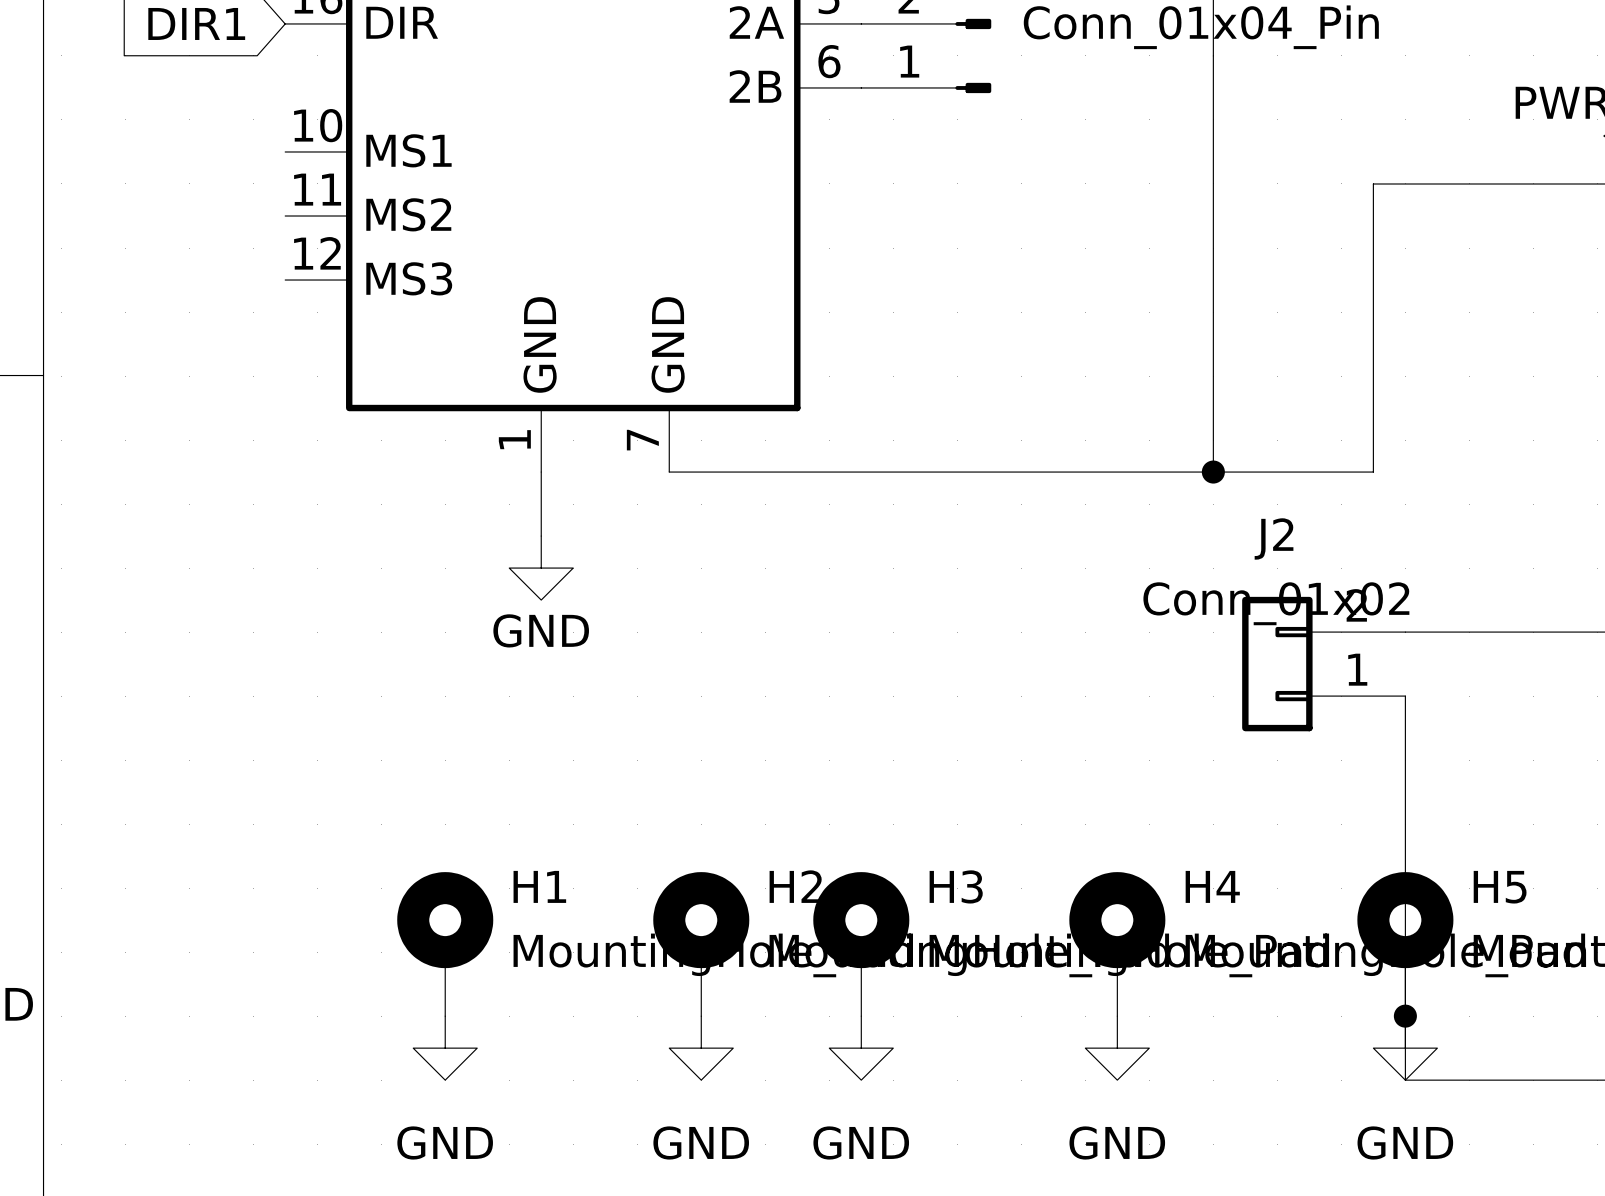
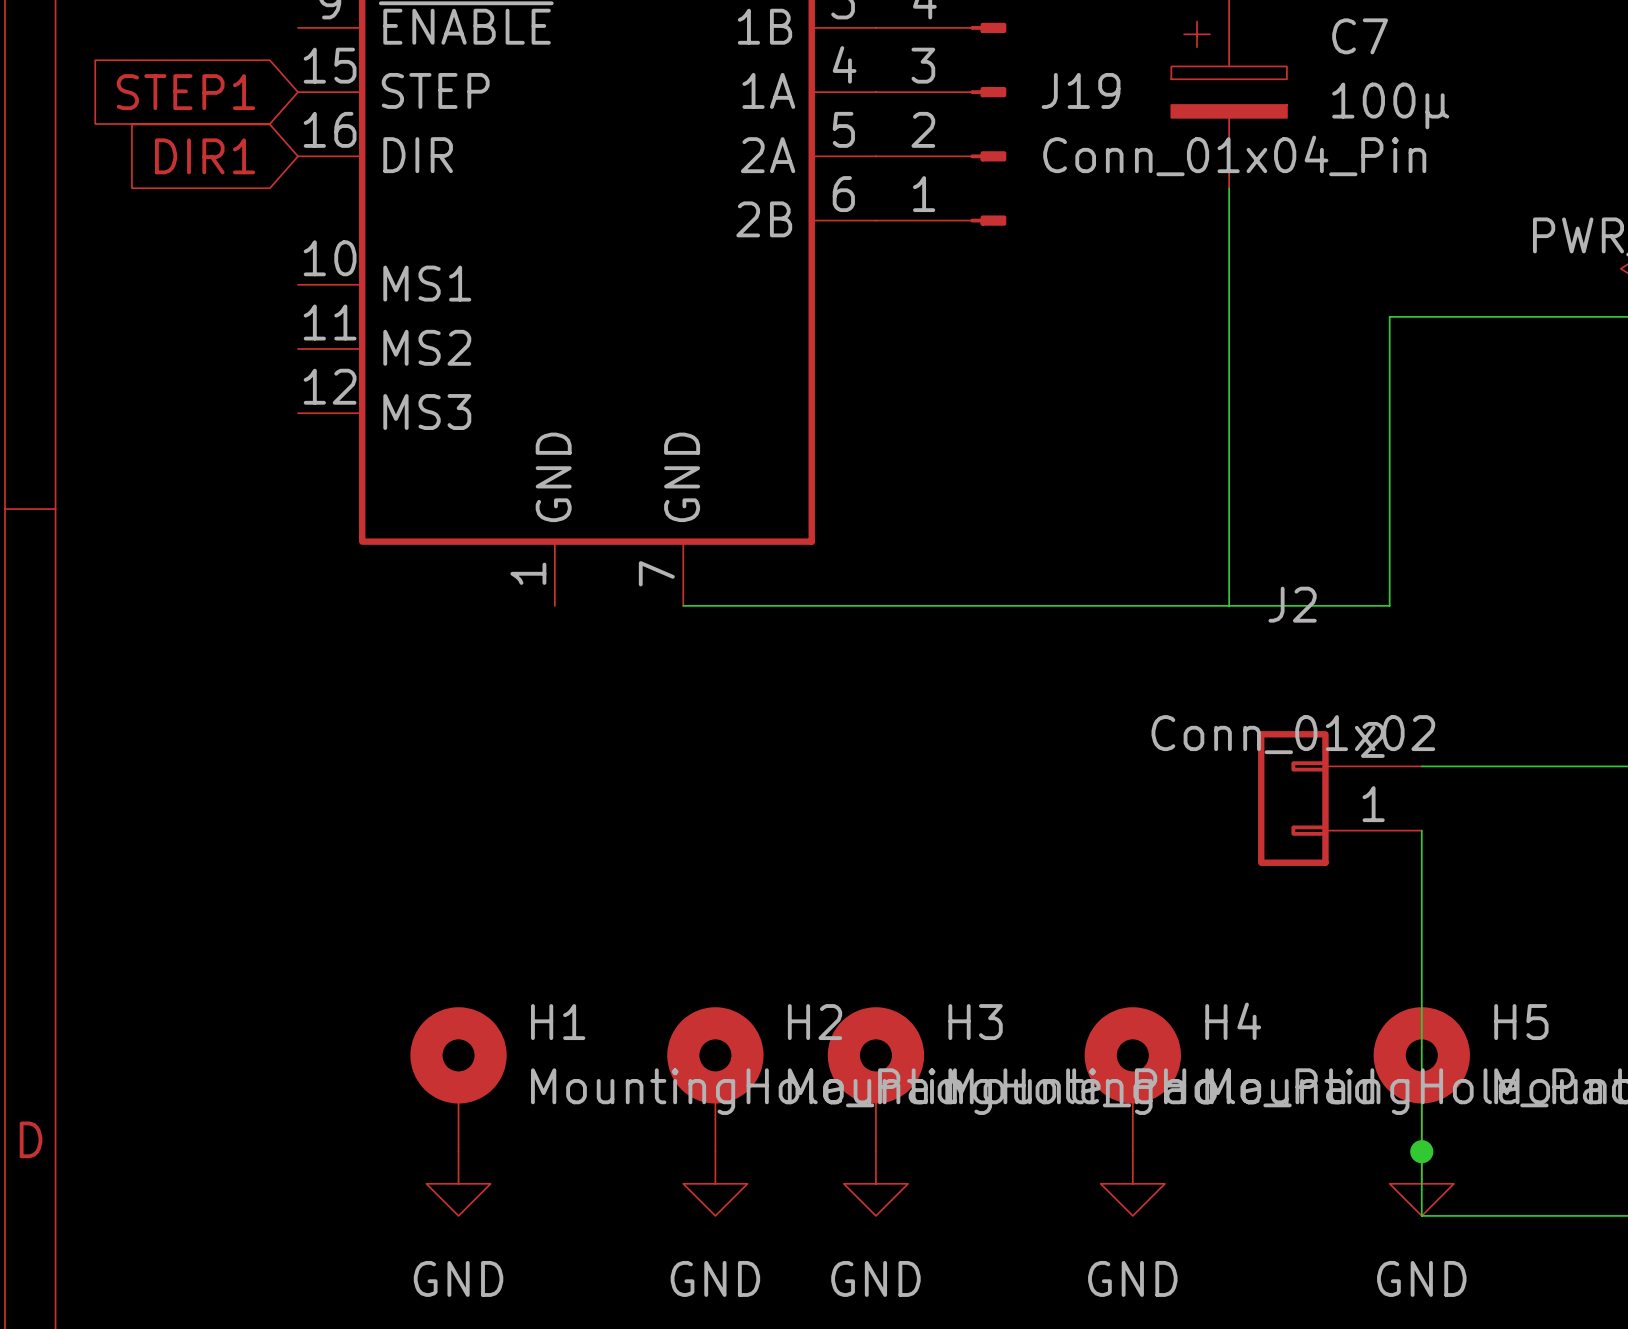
wire: (541, 472) (541, 536) -> none
junction: (1213, 472) -> none
J2 name position: J2 (1274, 538) -> J2 (1292, 604)
power symbol: GND (541, 568) -> none

